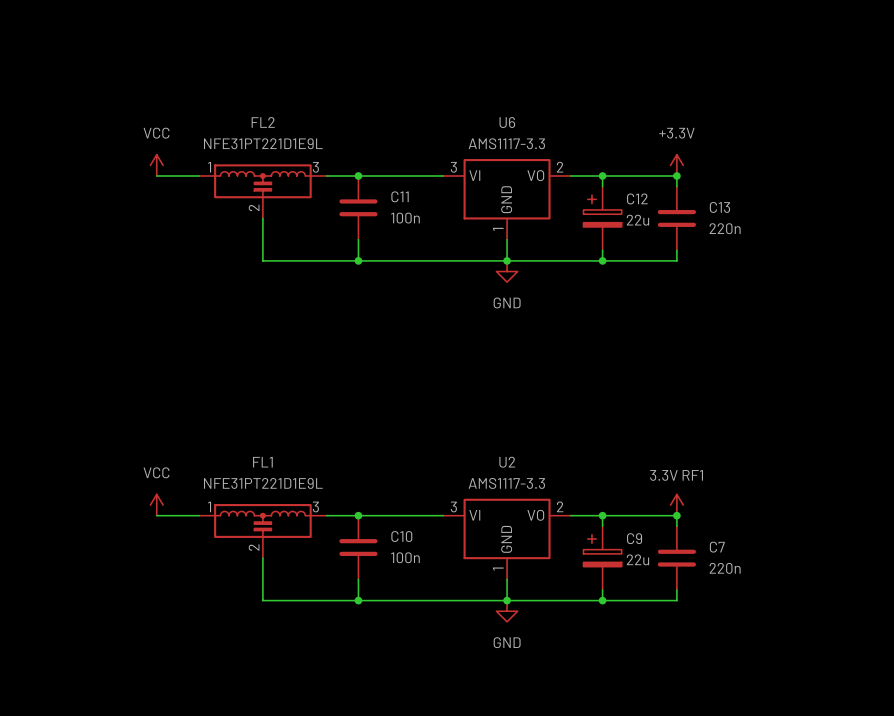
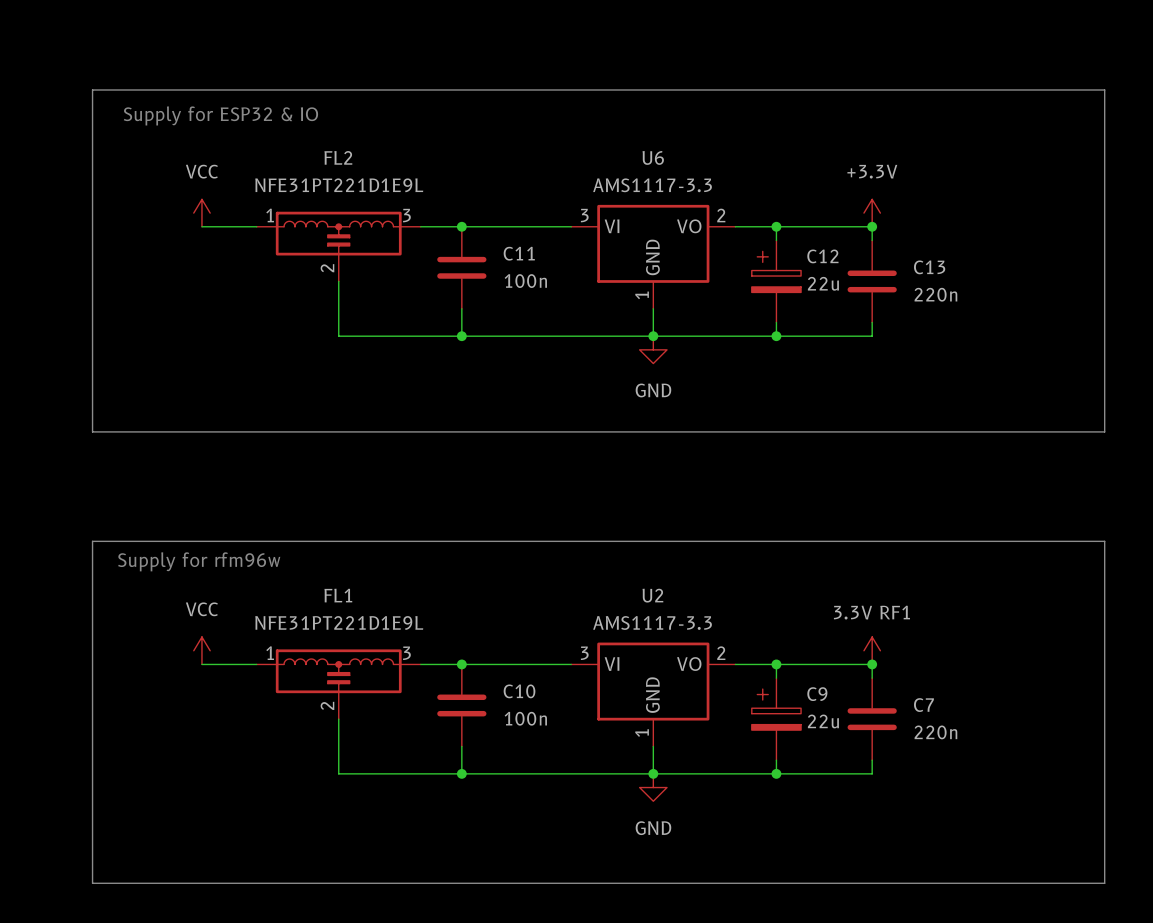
line: none -> (92, 89) (92, 431) (1104, 431) (1104, 89) (92, 89)
text: none -> Supply for ESP32 & IO (220, 115)
line: none -> (92, 541) (1104, 541) (1104, 883) (92, 883) (92, 541)
text: none -> Supply for rfm96w (199, 561)

